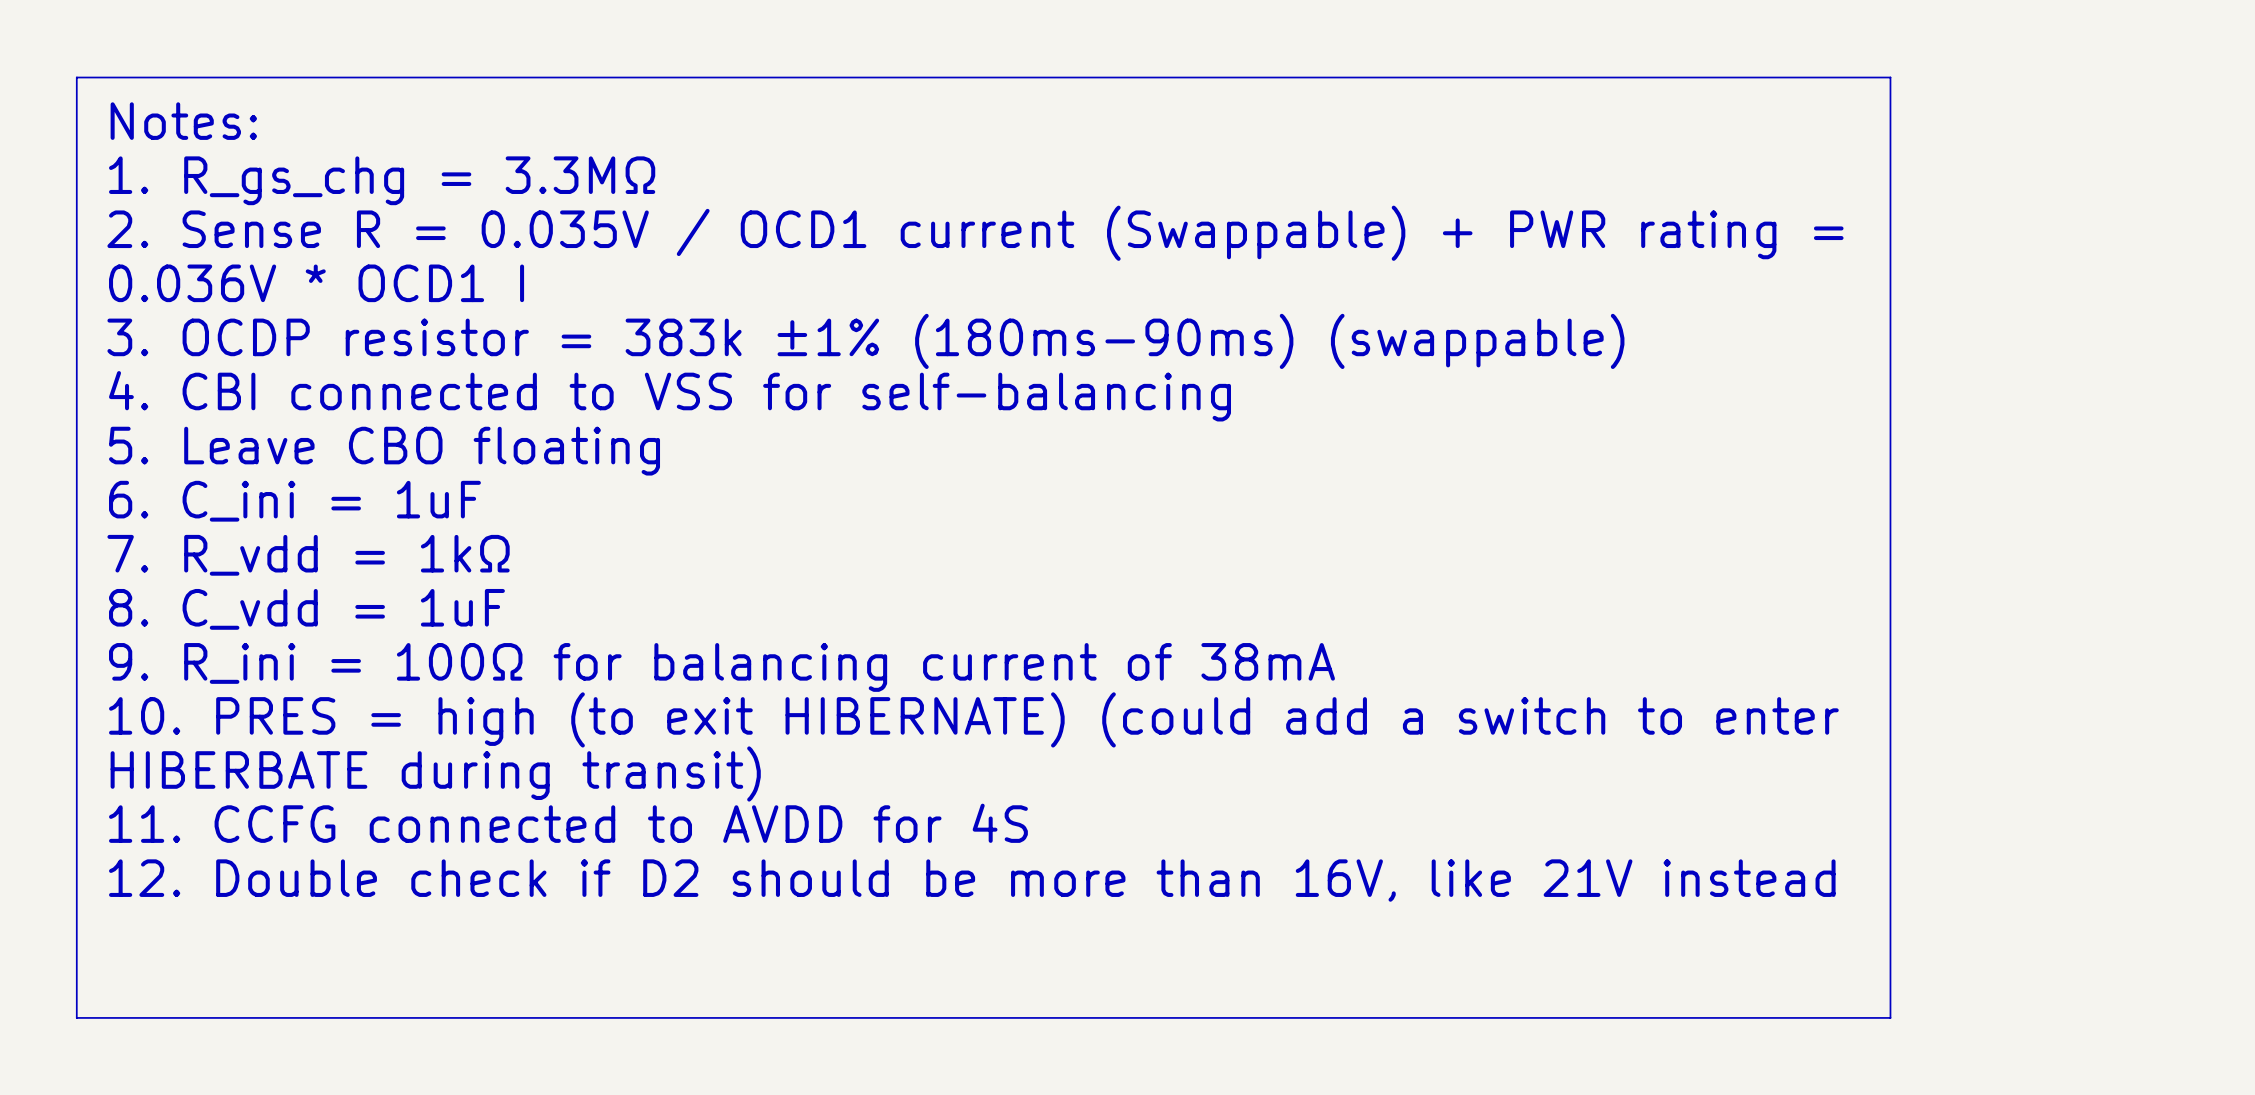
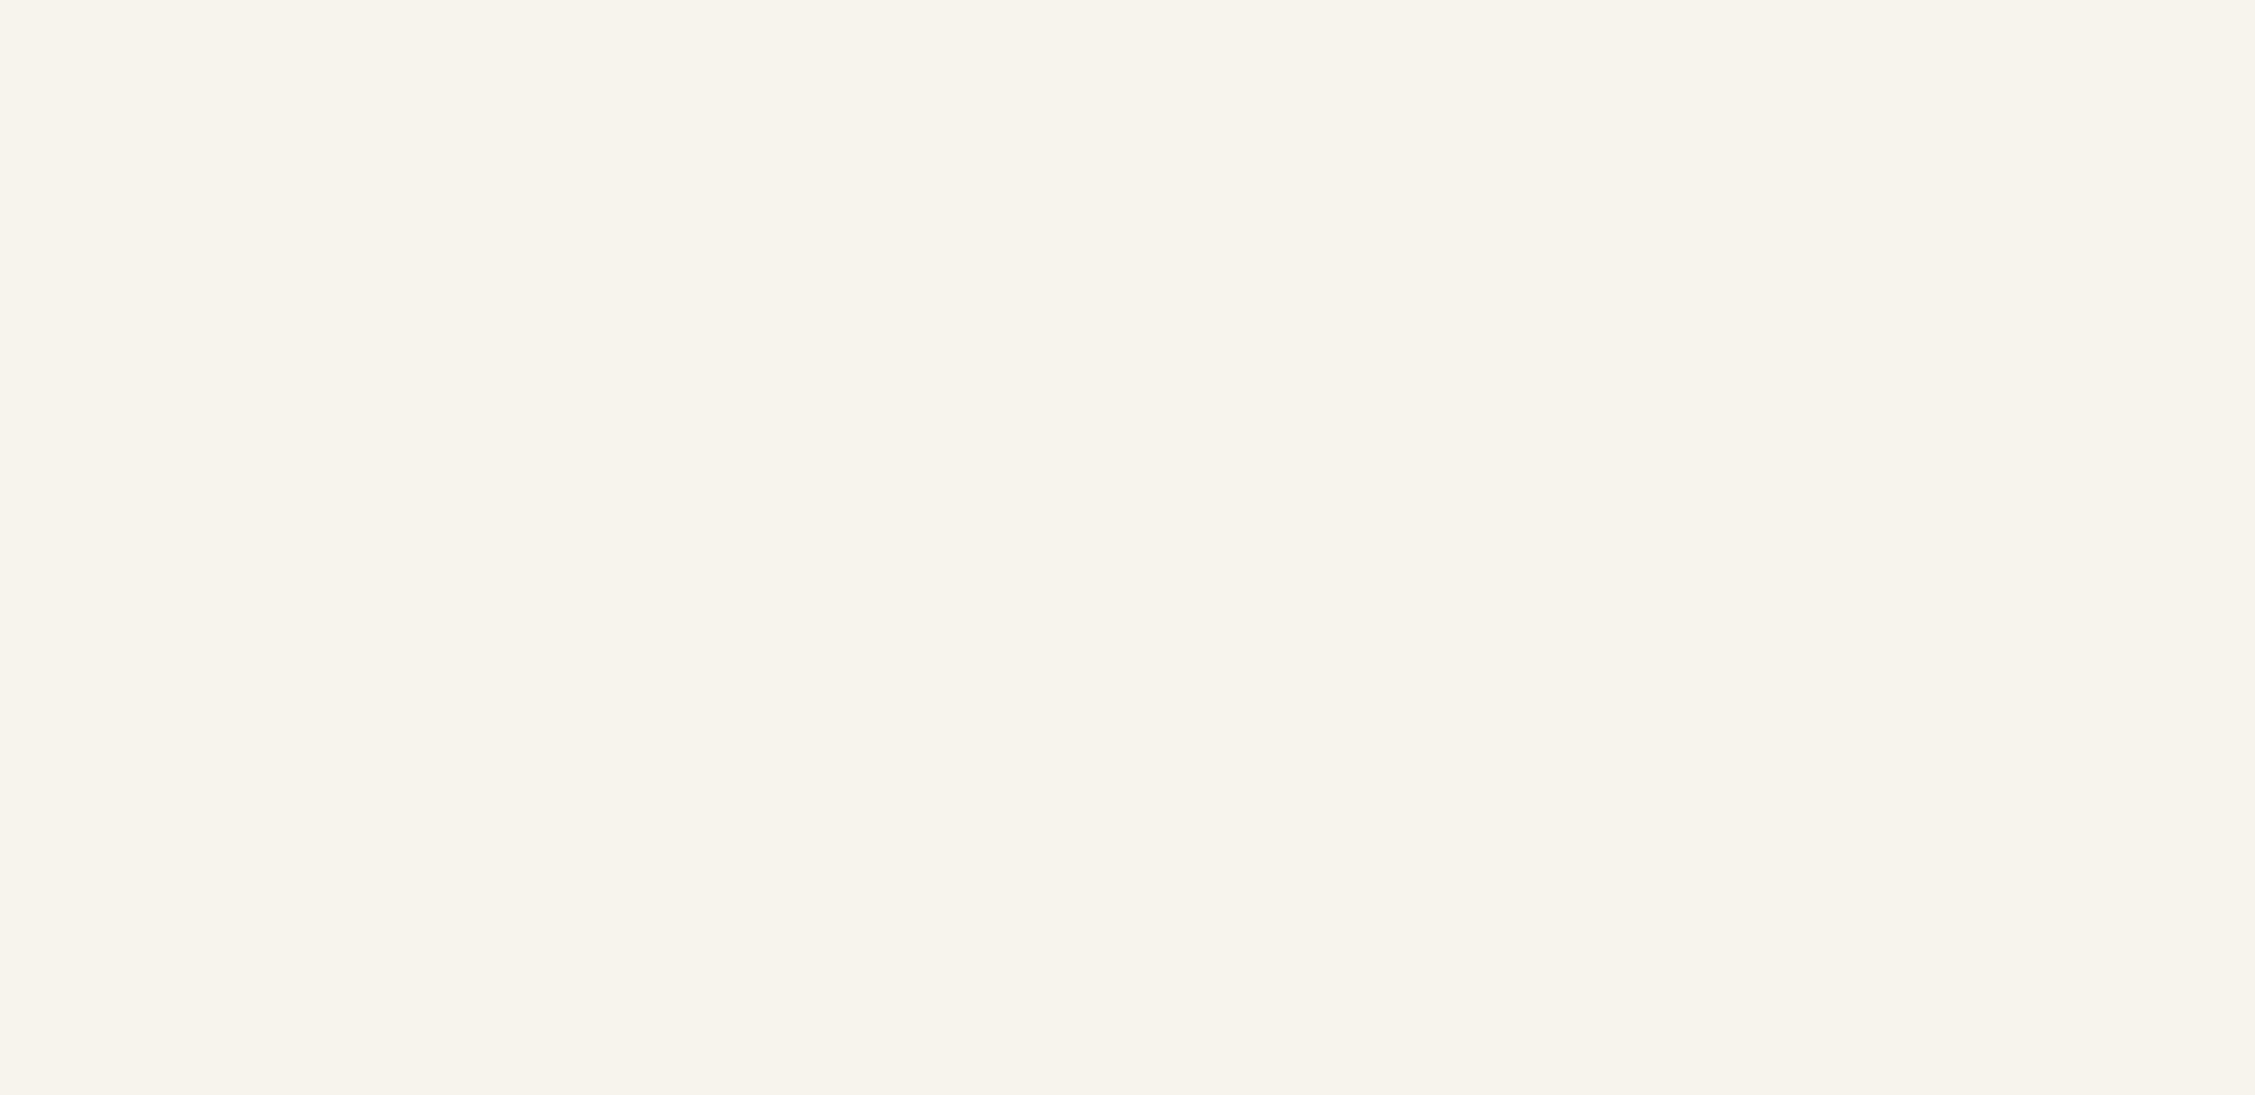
line: (76, 77) (1890, 77) (1890, 1017) (76, 1017) (76, 77) -> none
text: Notes: (183, 121) -> none
text: 1. R_gs_chg = 3.3MΩ (382, 180) -> none
text: 2. Sense R = 0.035V / OCD1 current (Swappable) + PWR rating = (975, 233) -> none
text: 0.036V * OCD1 I (316, 283) -> none
text: 3. OCDP resistor = 383k ±1% (180ms-90ms) (swappable) (865, 341) -> none
text: 4. CBI connected to VSS for self-balancing (670, 396) -> none
text: 5. Leave CBO floating (384, 451) -> none
text: 6. C_ini = 1uF (294, 501) -> none
text: 7. R_vdd = 1kΩ (308, 555) -> none
text: 8. C_vdd = 1uF (306, 609) -> none
text: 9. R_ini = 100Ω for balancing current of 38mA (721, 667) -> none
text: 10. PRES = high (to exit HIBERNATE) (could add a switch to enter (973, 719) -> none
text: HIBERBATE during transit) (435, 773) -> none
text: 11. CCFG connected to AVDD for 4S (568, 823) -> none
text: 12. Double check if D2 should be more than 16V, like 21V instead (972, 880) -> none

